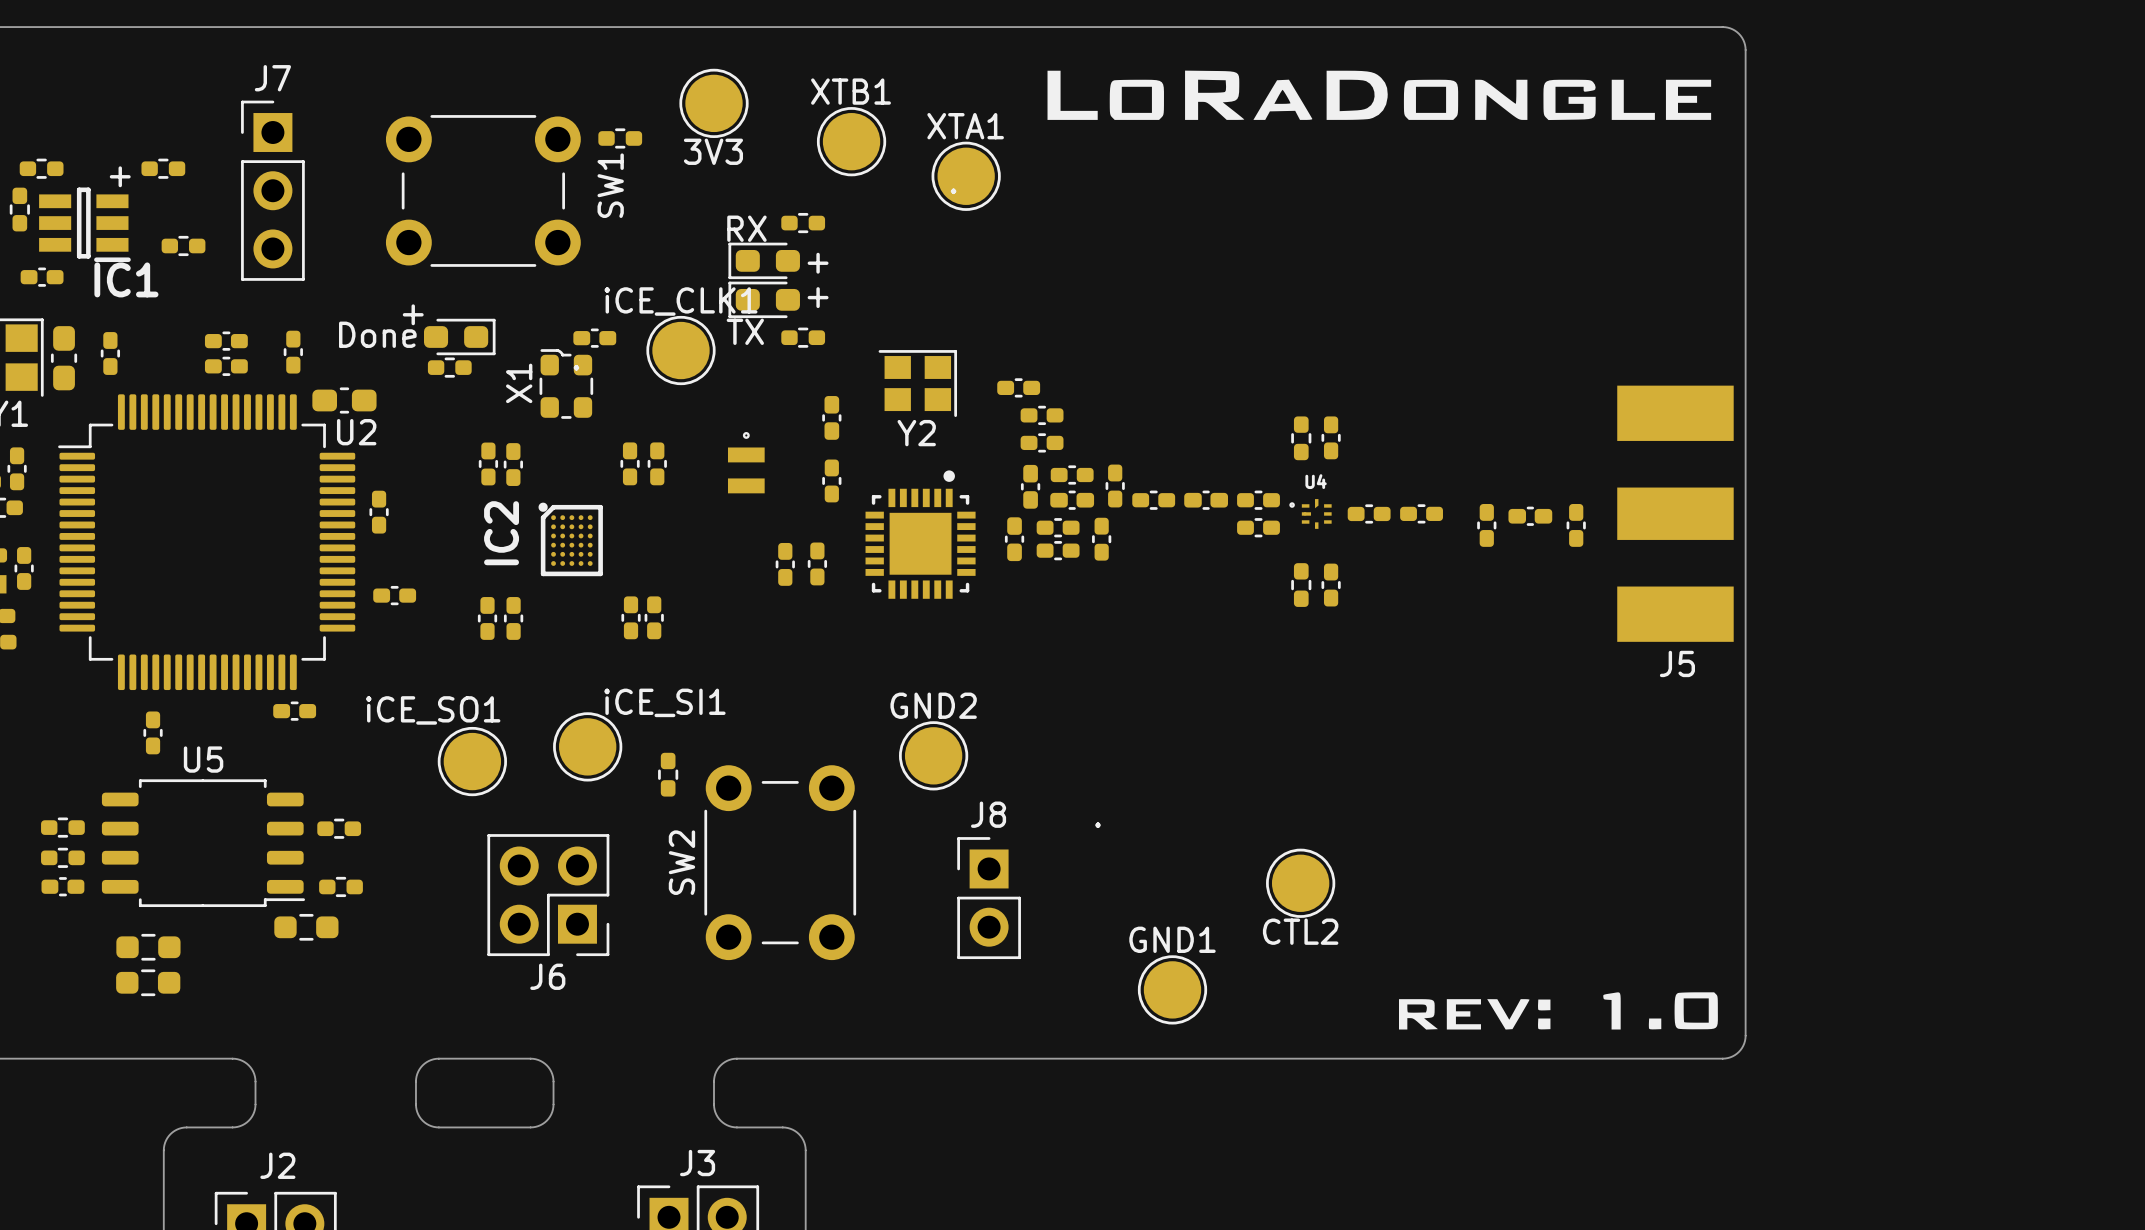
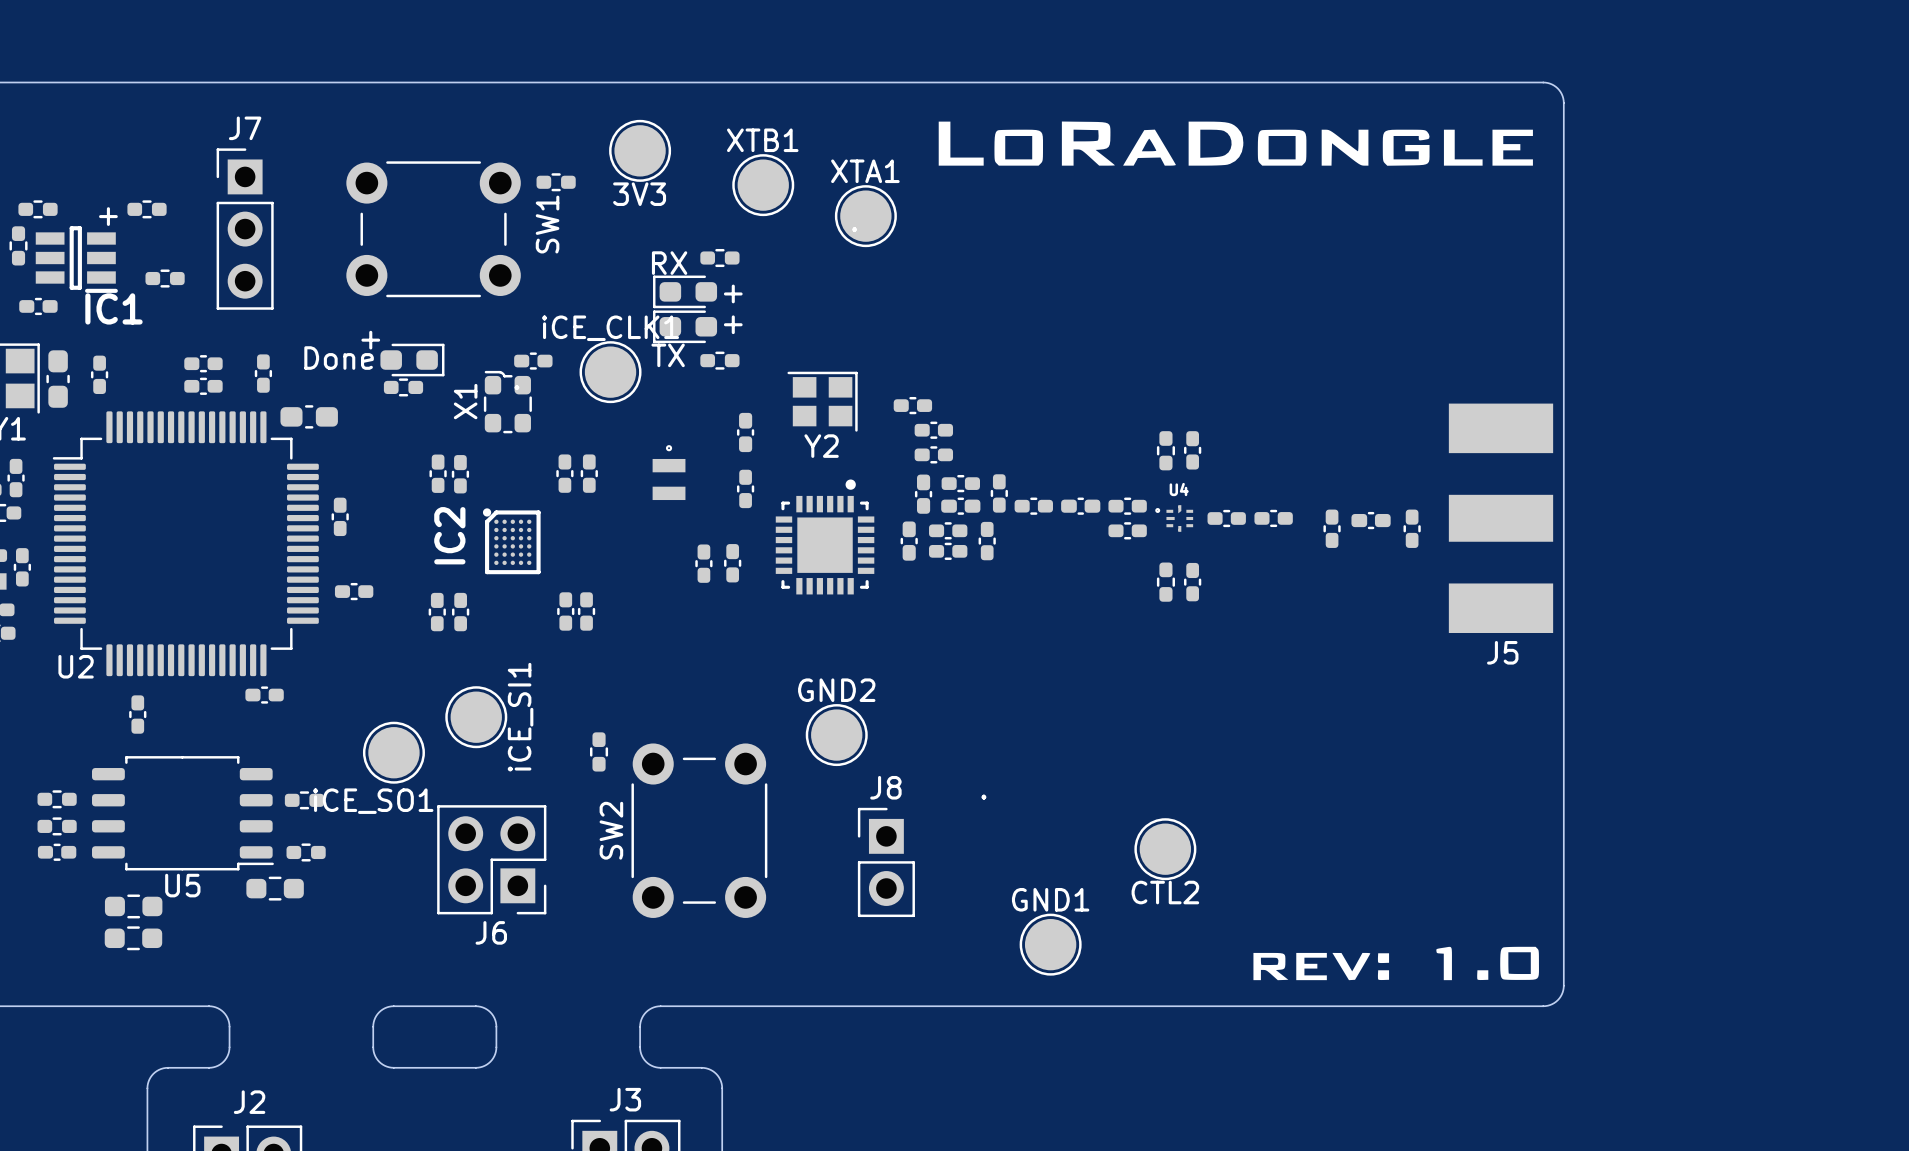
U2 name position: U2 (356, 432) -> U2 (76, 666)
iCE_SI1 name rotation: 0° (664, 702) -> 90° counterclockwise (520, 717)
iCE_SO1 name position: iCE_SO1 (433, 710) -> iCE_SO1 (373, 801)
iCE_SI1 position: (587, 746) -> (476, 717)
U5 name position: U5 (203, 759) -> U5 (182, 885)
iCE_SO1 position: (472, 761) -> (393, 752)

